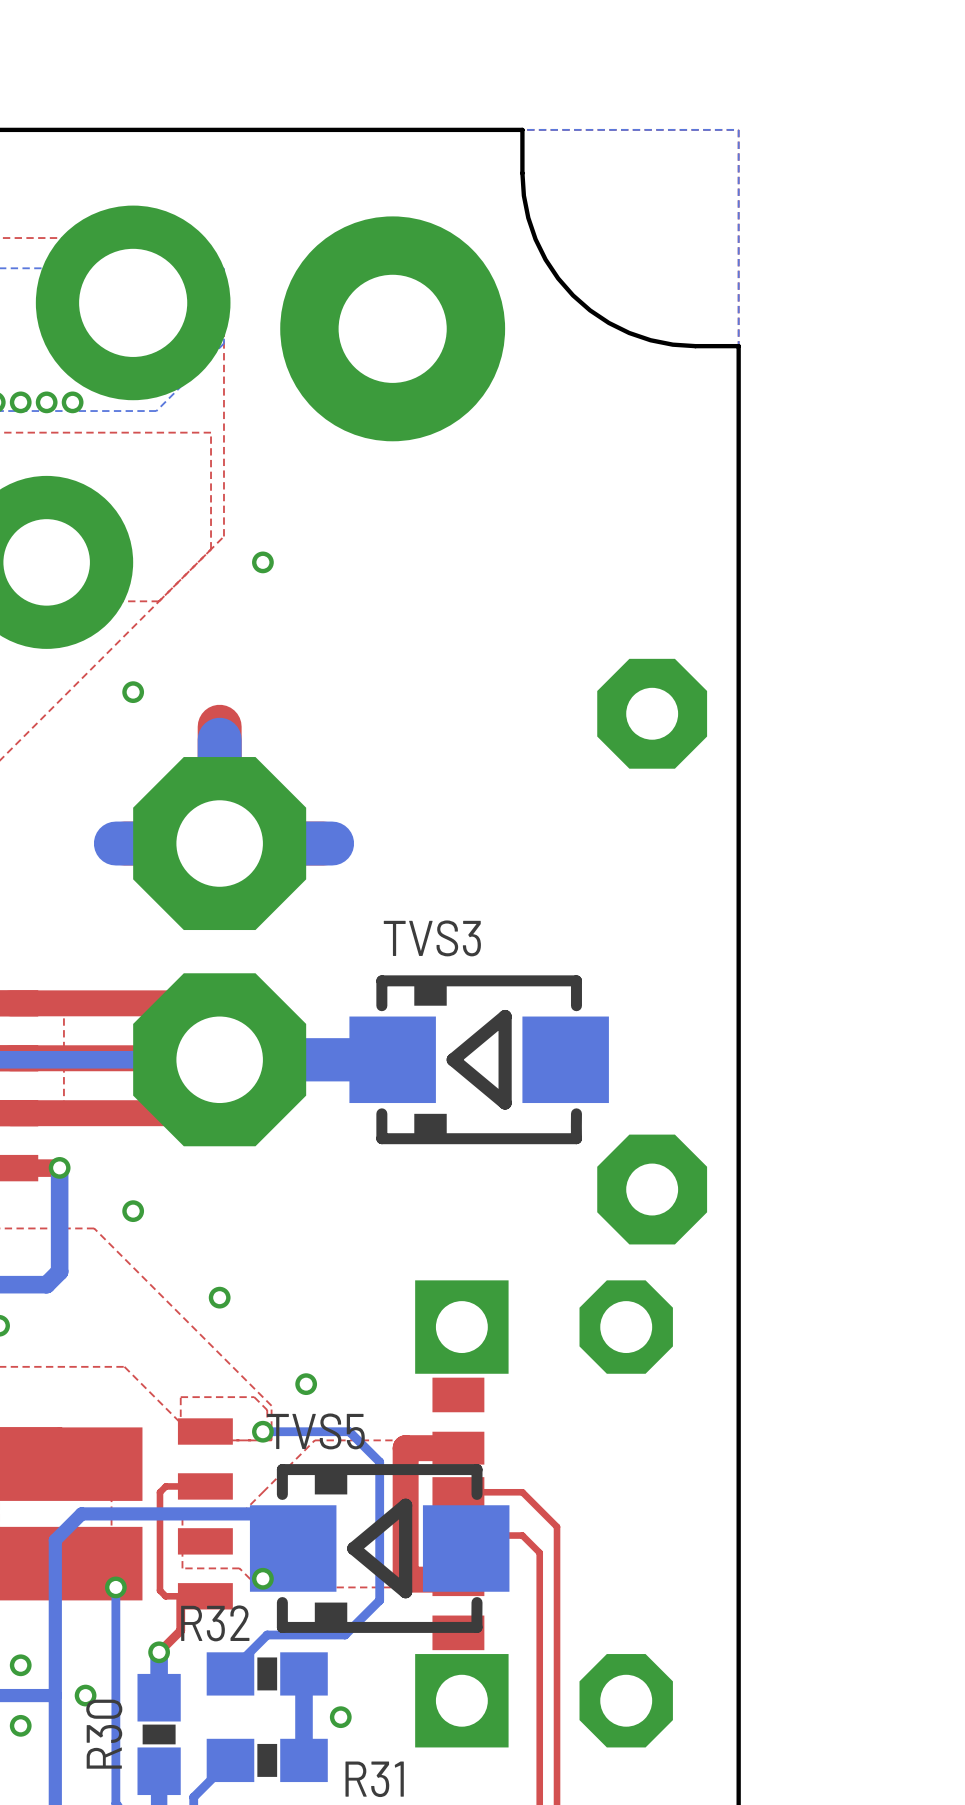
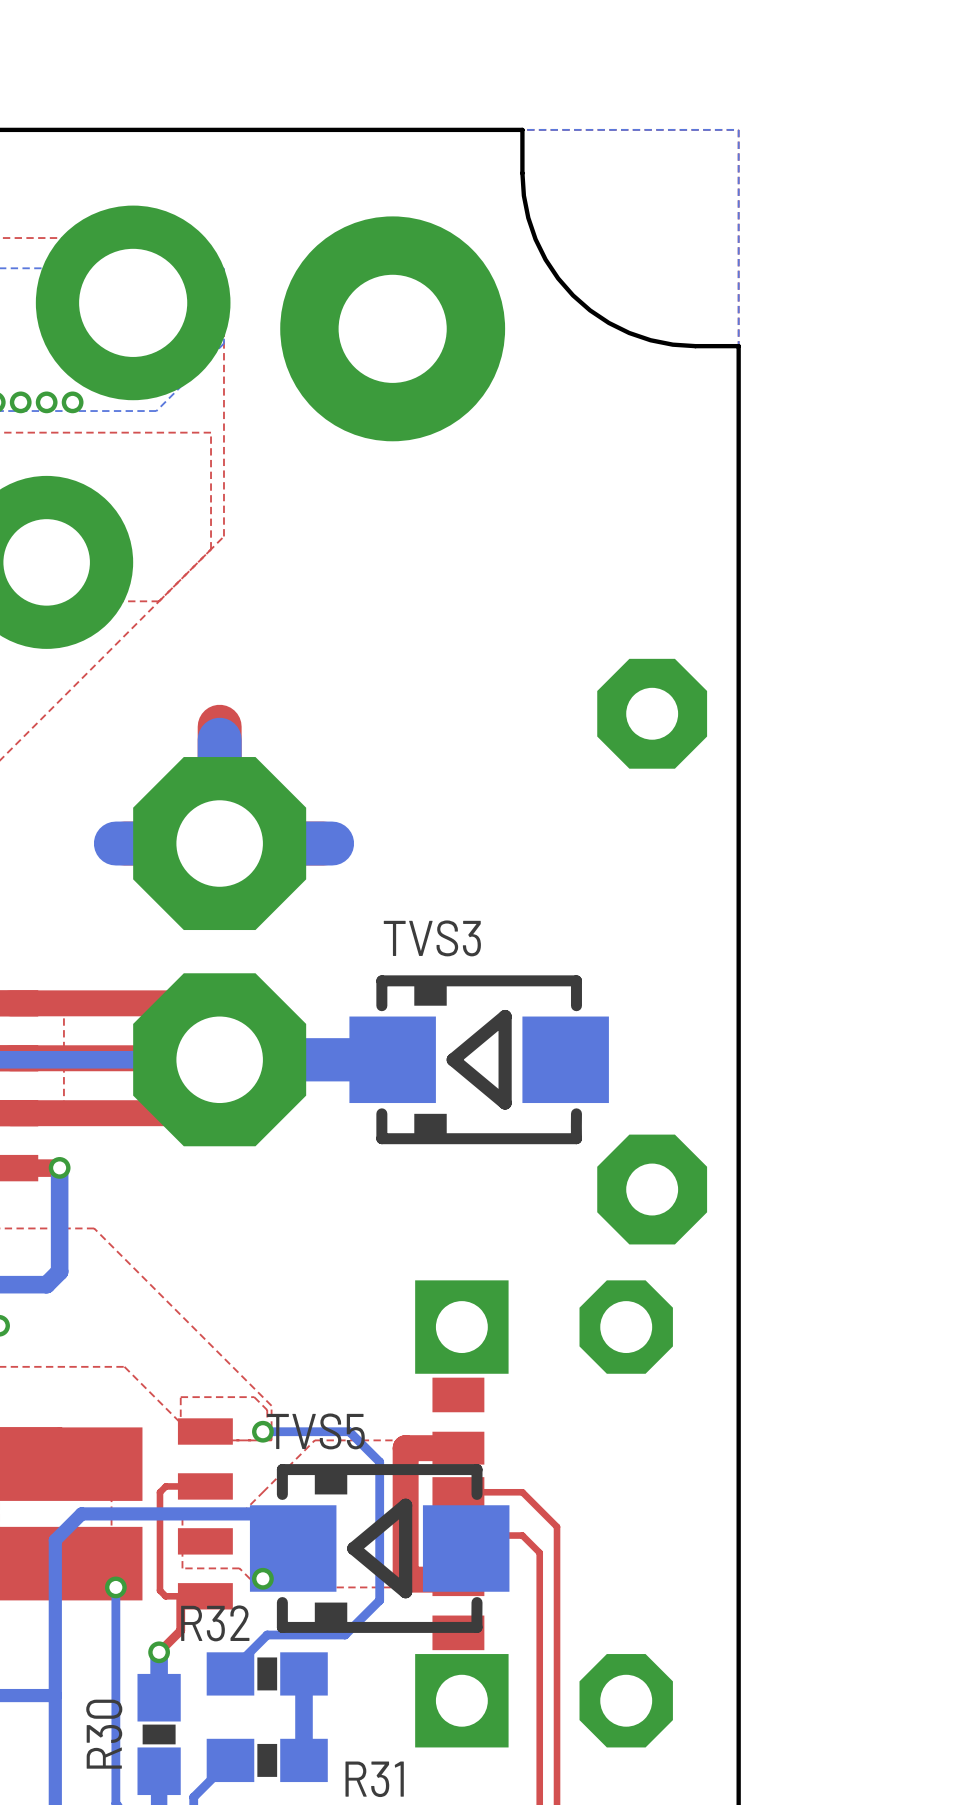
via: (262, 562) -> none
via: (133, 692) -> none
via: (133, 1211) -> none
via: (219, 1297) -> none
via: (306, 1384) -> none
via: (20, 1665) -> none
via: (85, 1695) -> none
via: (340, 1717) -> none
via: (20, 1725) -> none

